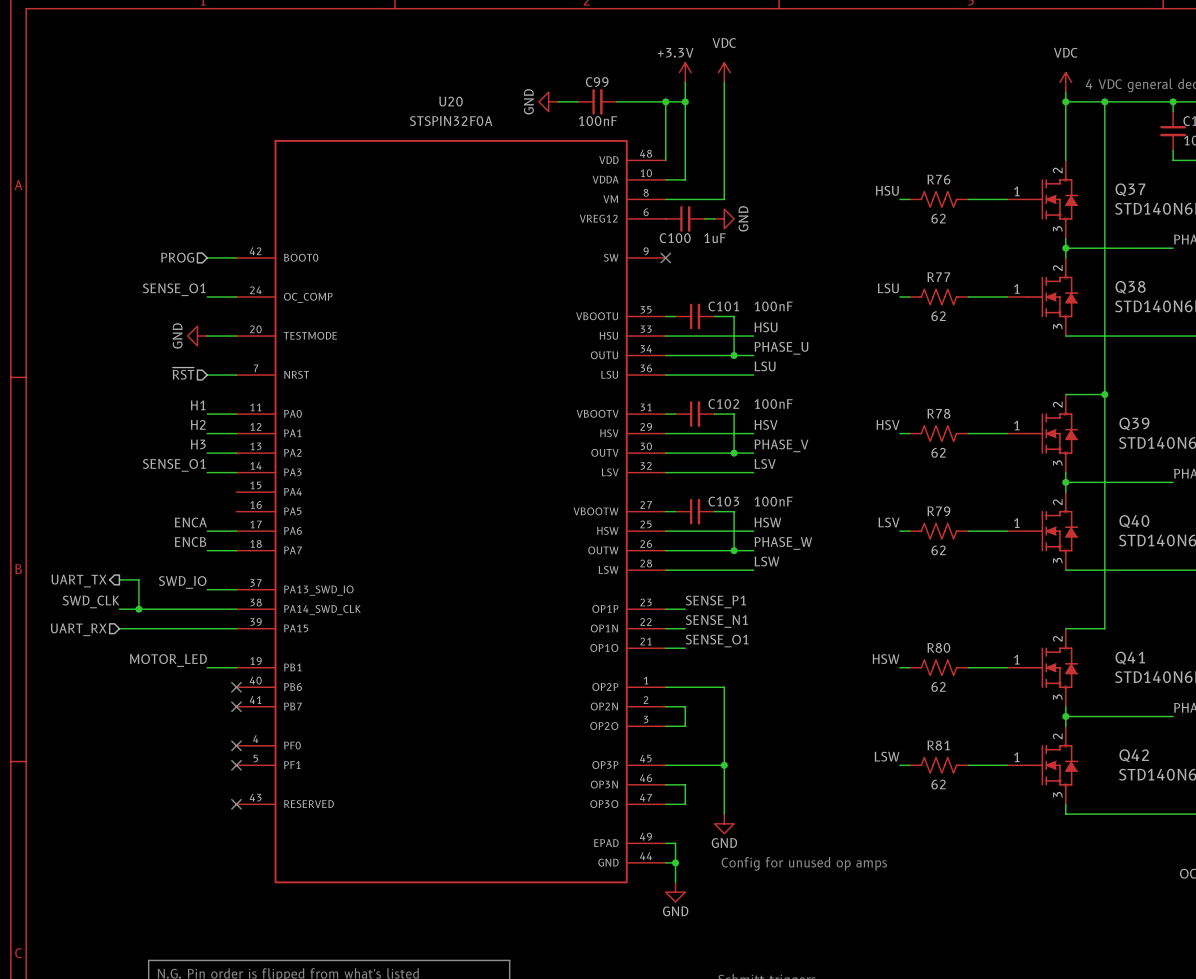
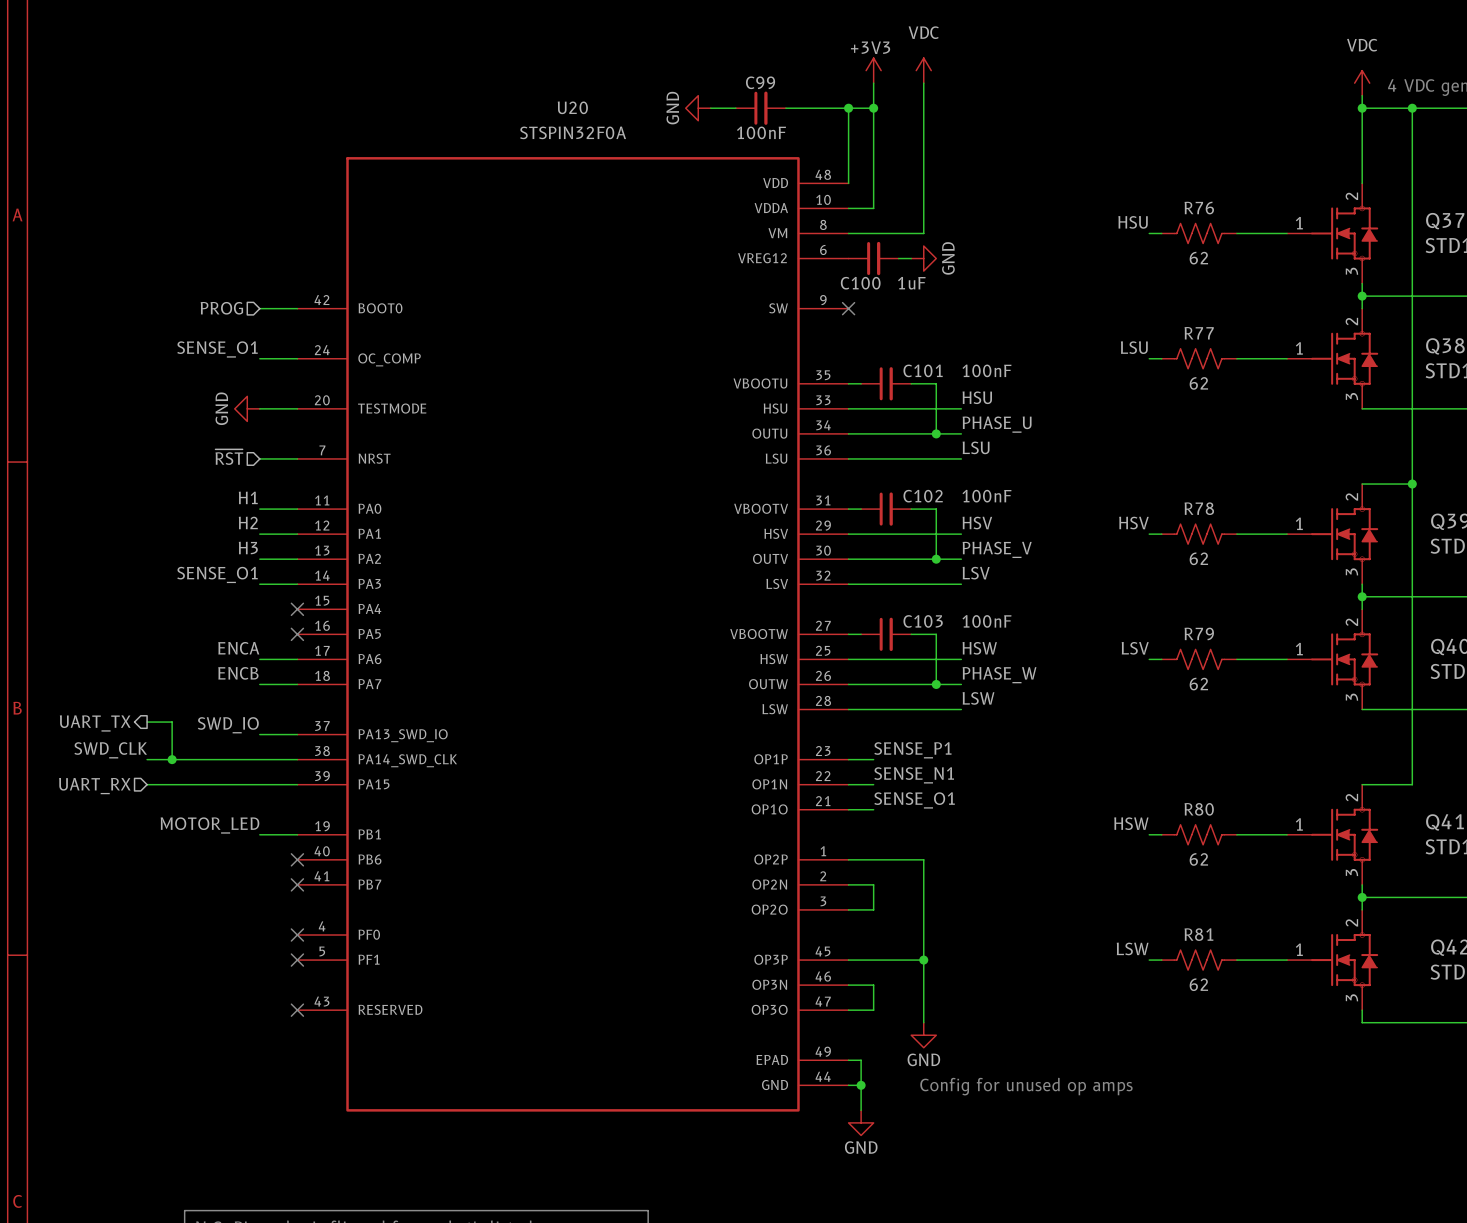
power symbol: +3.3V (685, 72) -> +3V3 (873, 70)
no-connect mark: none -> (297, 609)
no-connect mark: none -> (297, 634)

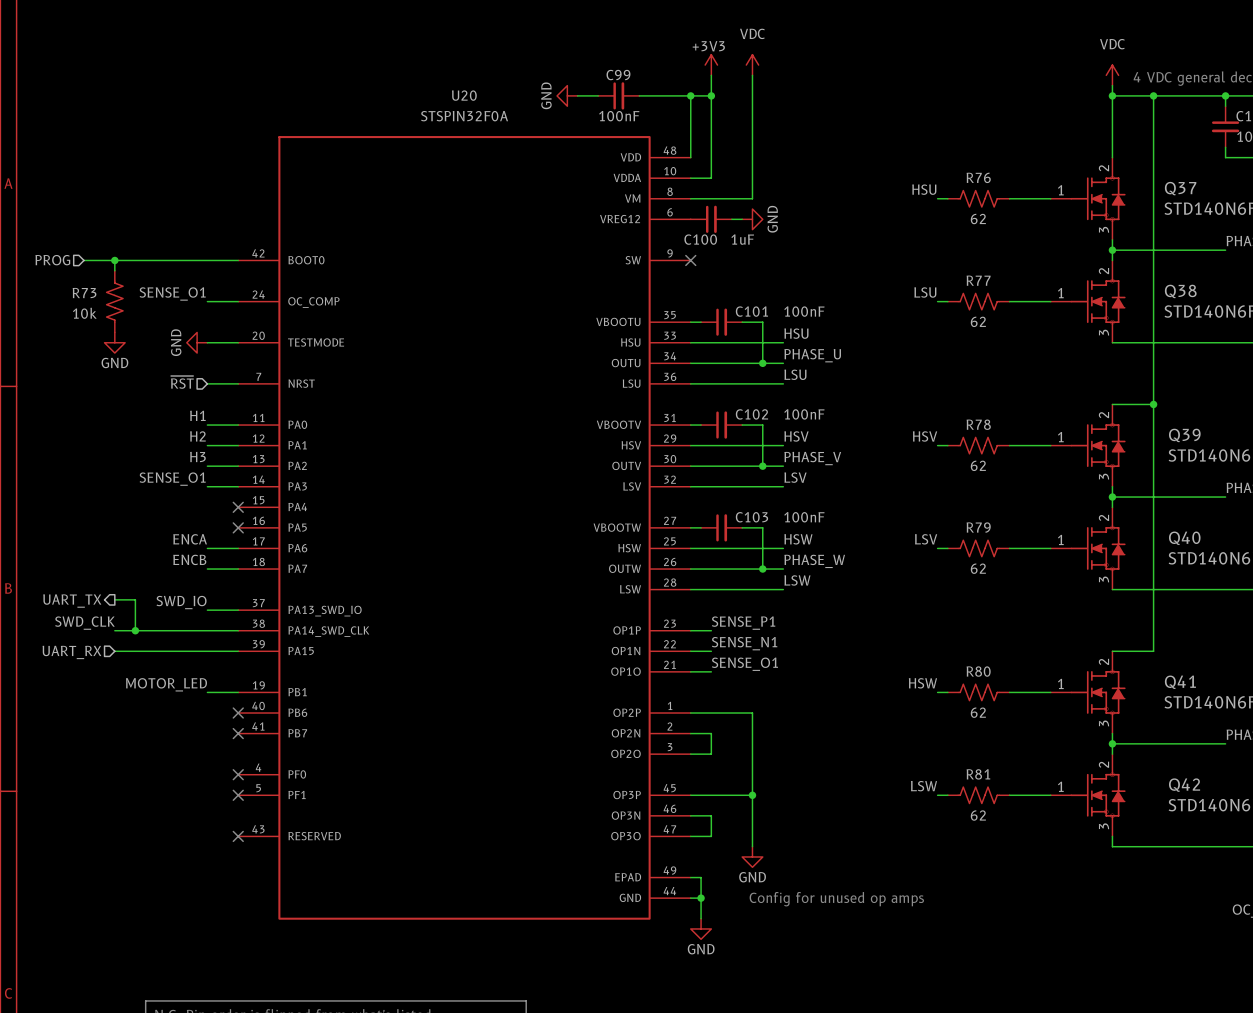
wire: none -> (83, 260) (207, 260)
wire: none -> (114, 260) (114, 270)
junction: none -> (114, 260)
hierarchical label position: PROG (221, 308) -> PROG (52, 260)
R73: none -> 10k (114, 301)
power symbol: none -> GND (114, 342)

